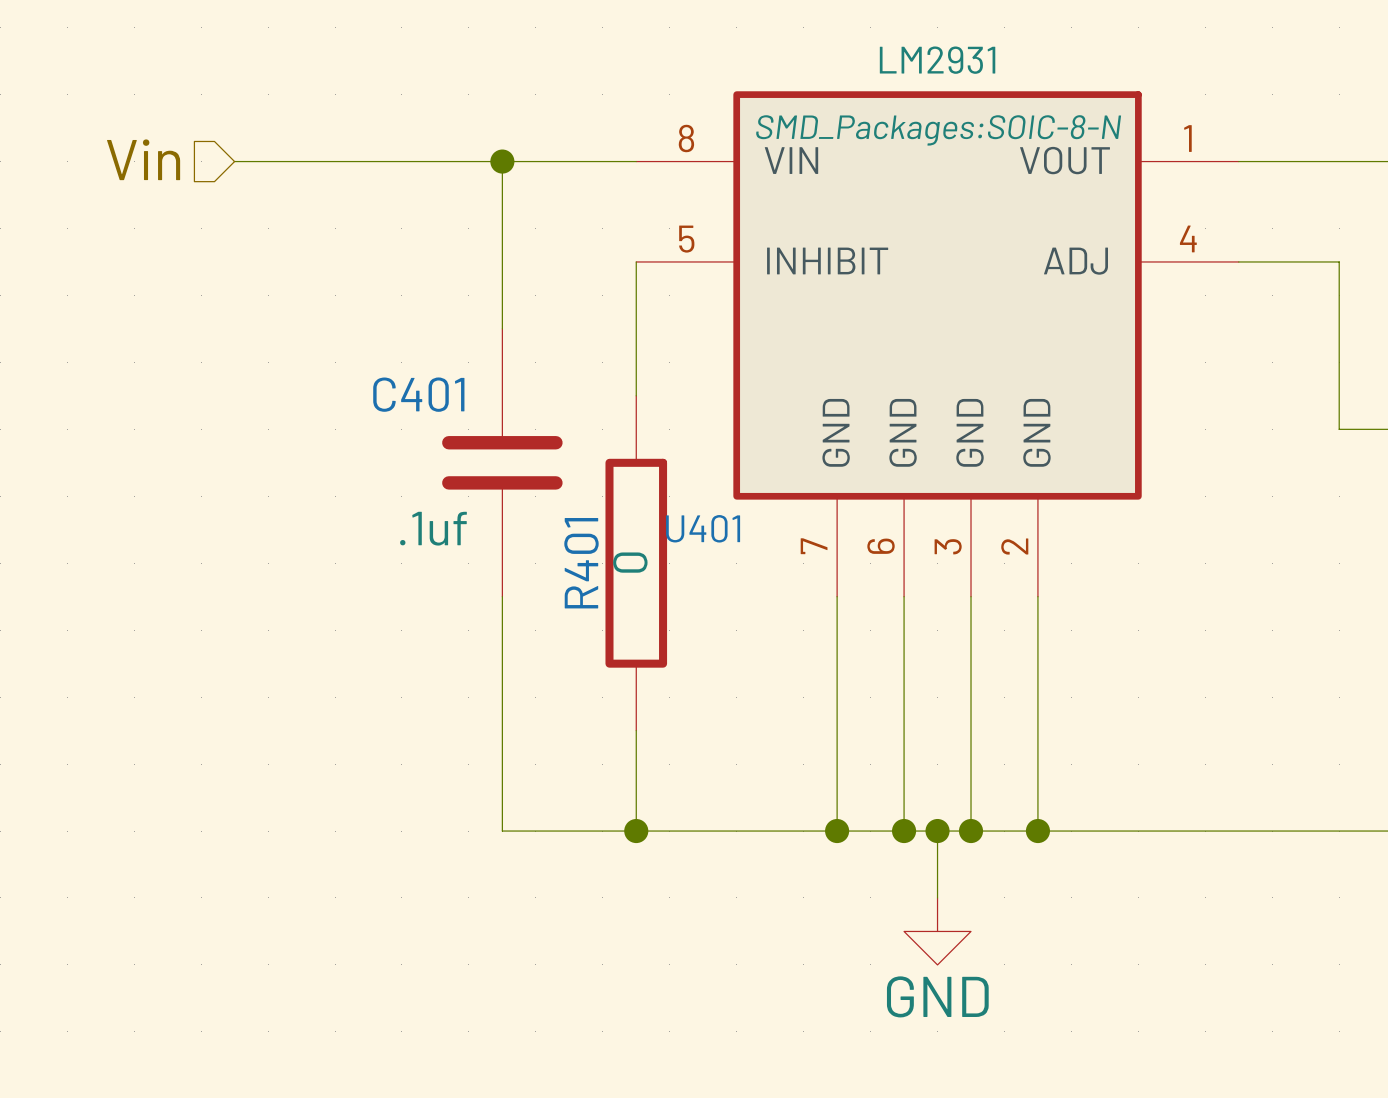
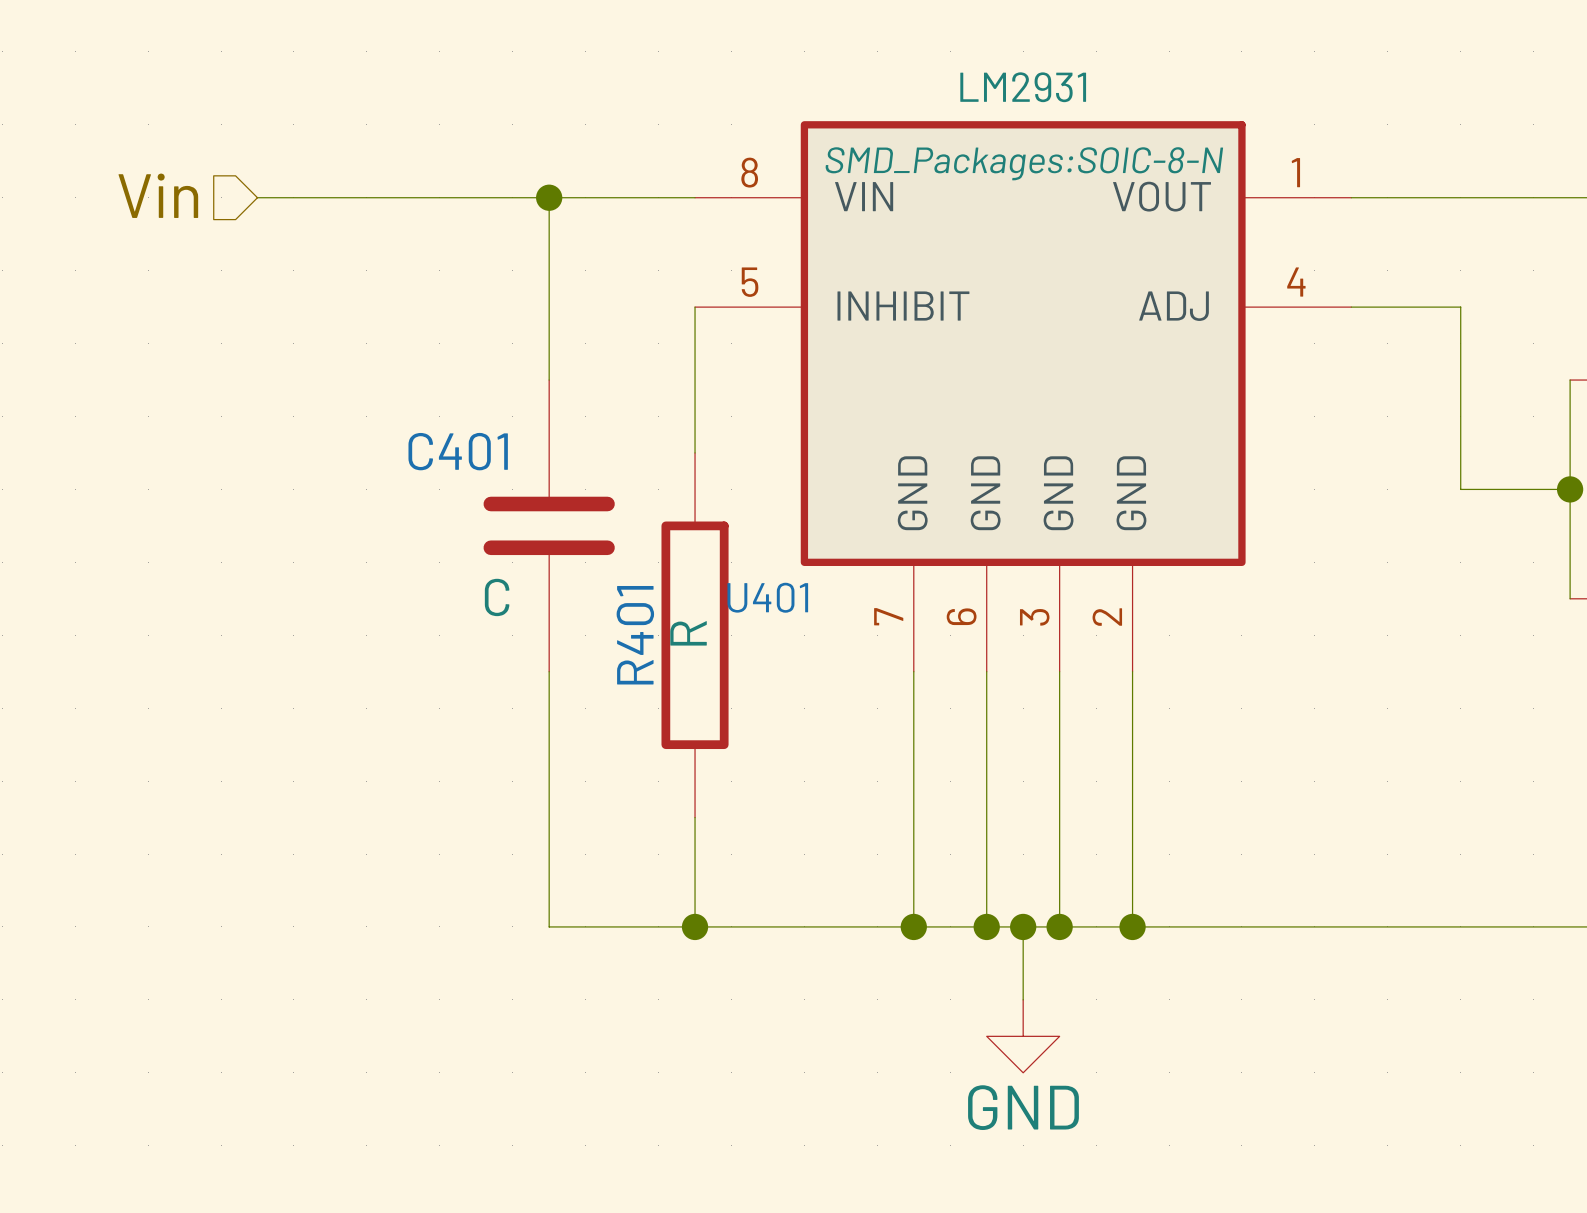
C401 value: .1uf (433, 528) -> C (497, 597)
R401 value: 0 (630, 562) -> R (688, 633)

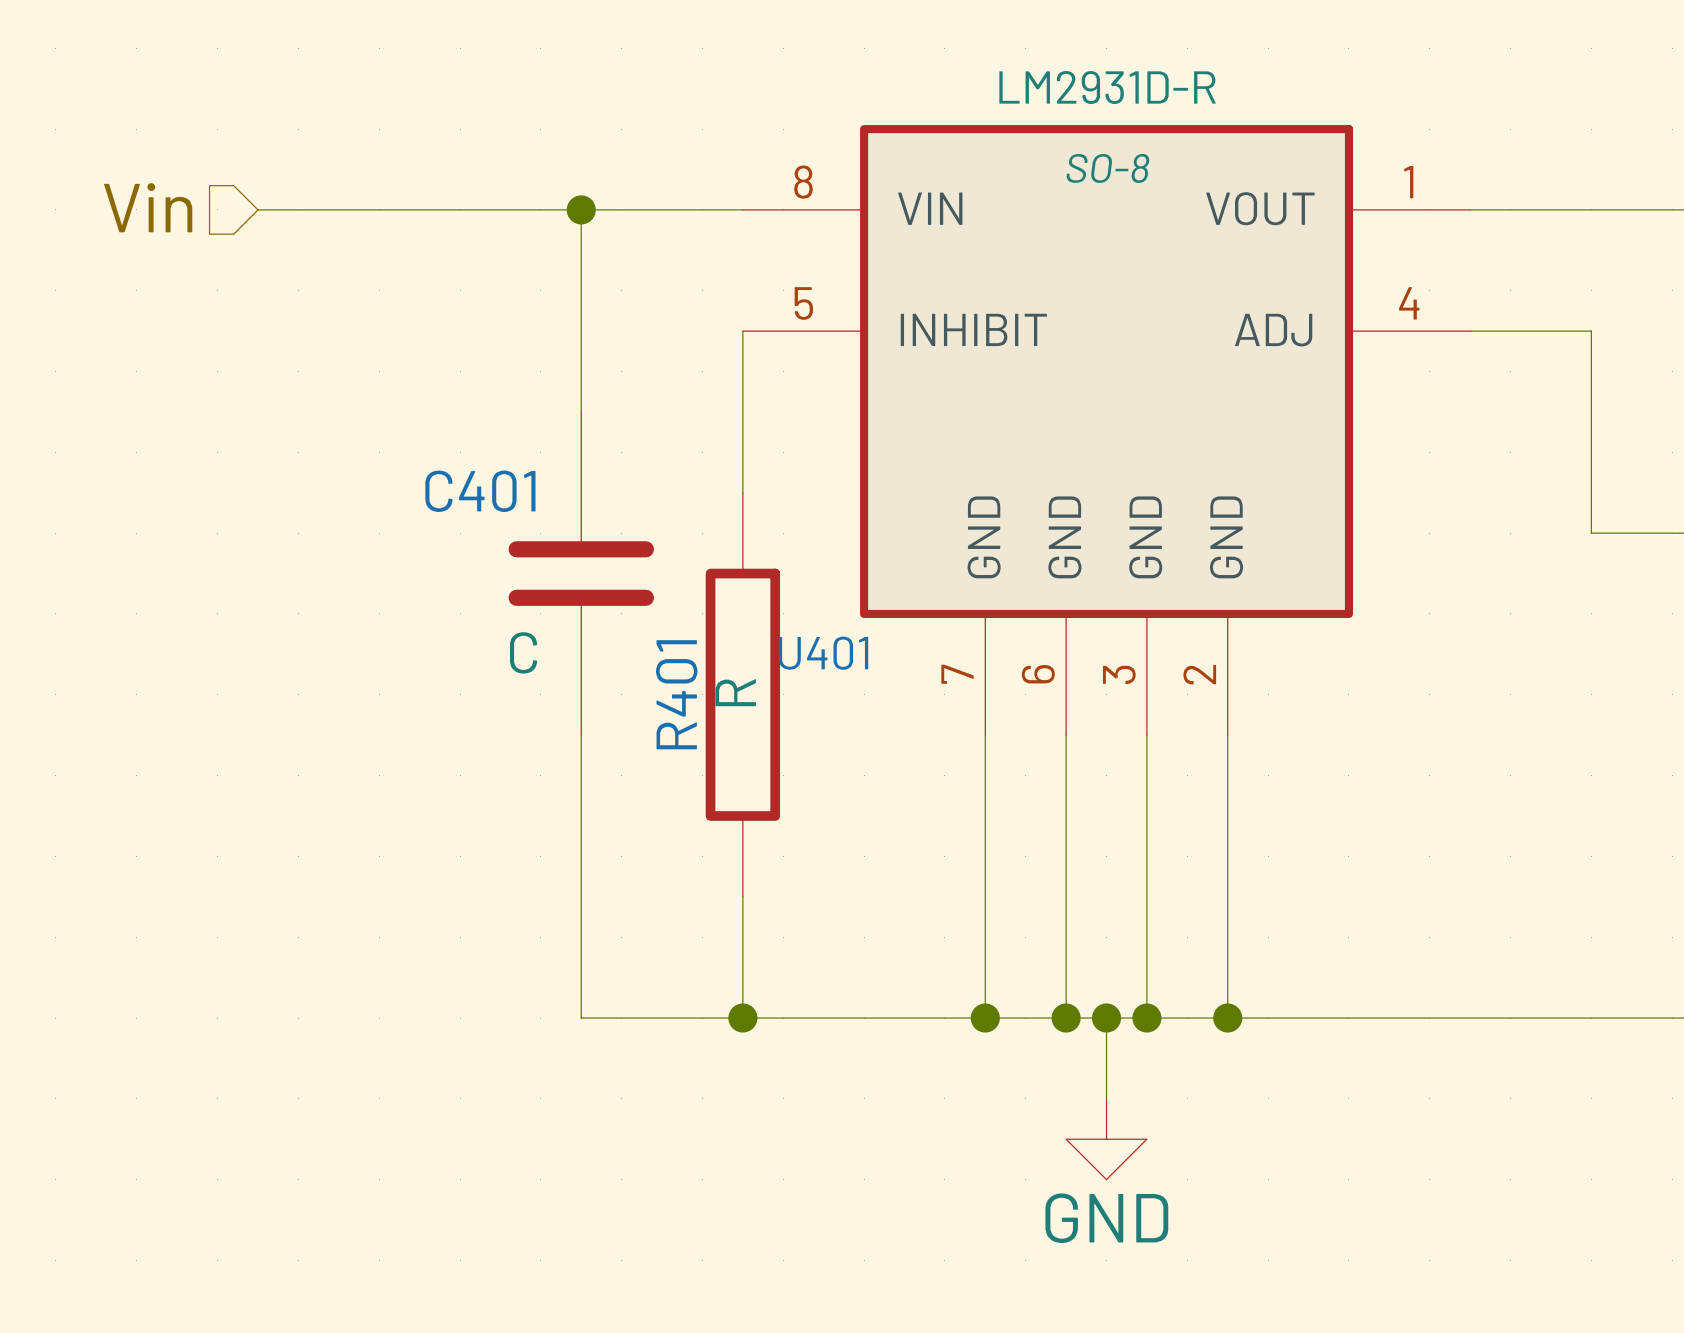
U401 value: LM2931 (1023, 87) -> LM2931D-R (1107, 87)
U401 text: SMD_Packages:SOIC-8-N (1024, 163) -> SO-8 (1107, 168)

